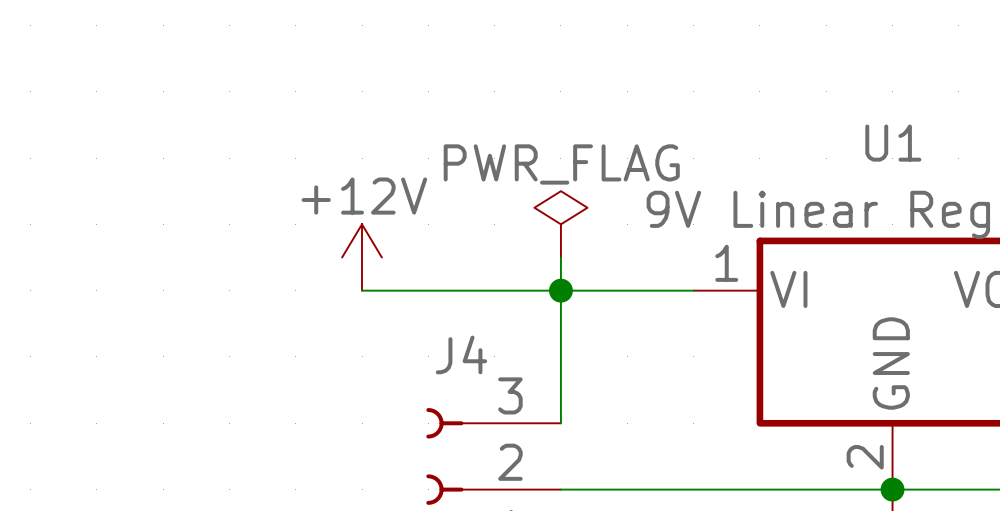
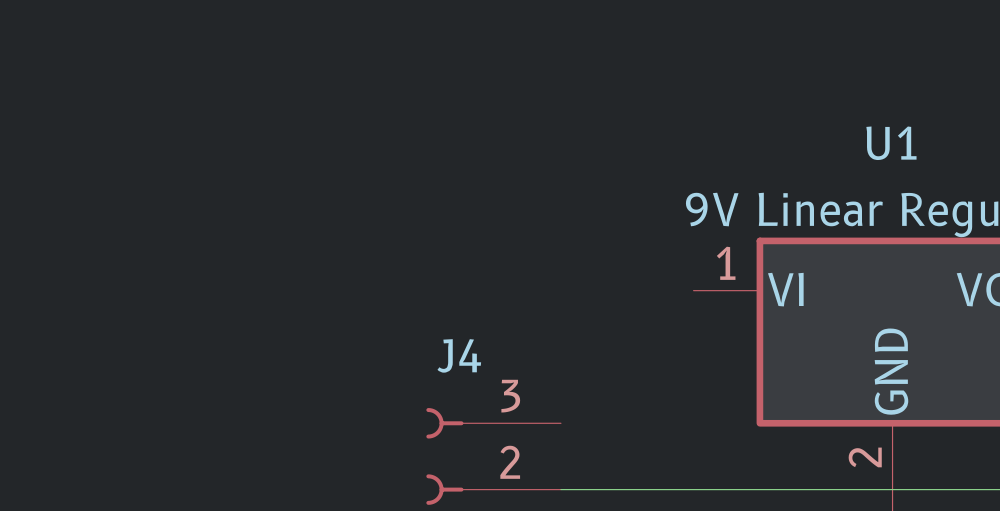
power symbol: PWR_FLAG (560, 224) -> none
power symbol: +12V (362, 257) -> none
wire: (560, 257) (560, 423) -> none
wire: (362, 290) (693, 290) -> none
junction: (560, 290) -> none
junction: (892, 489) -> none

